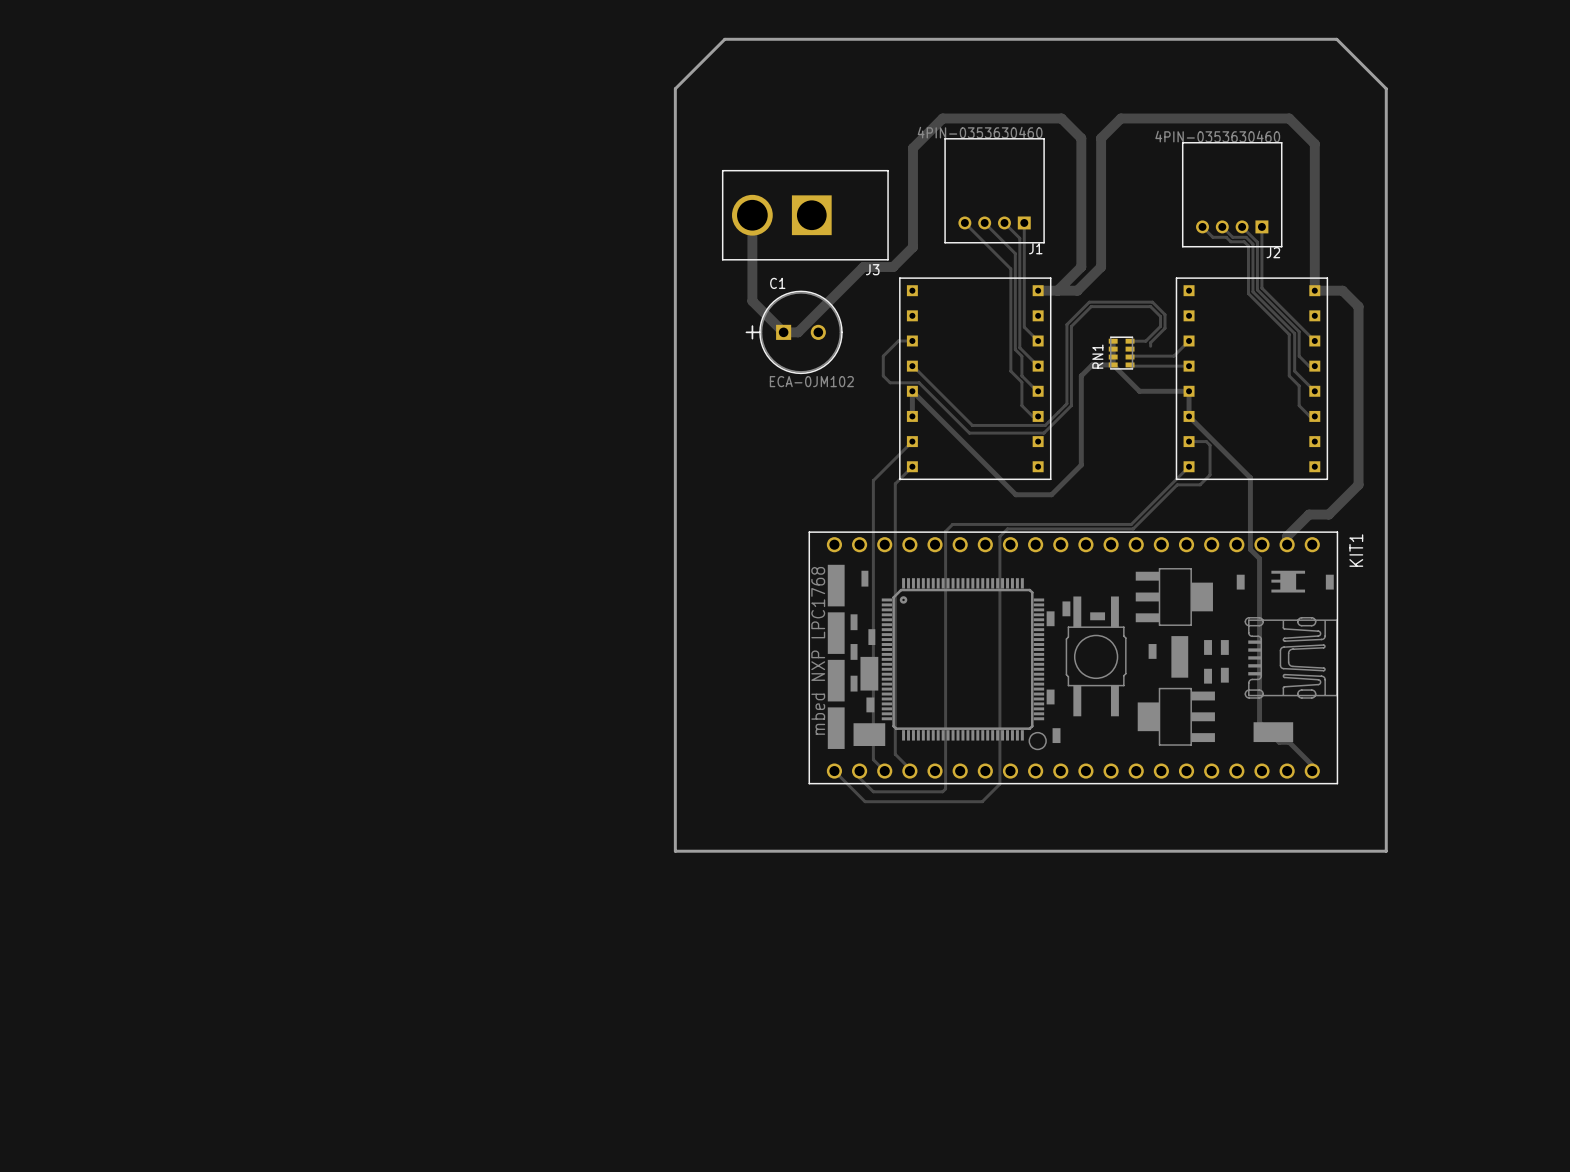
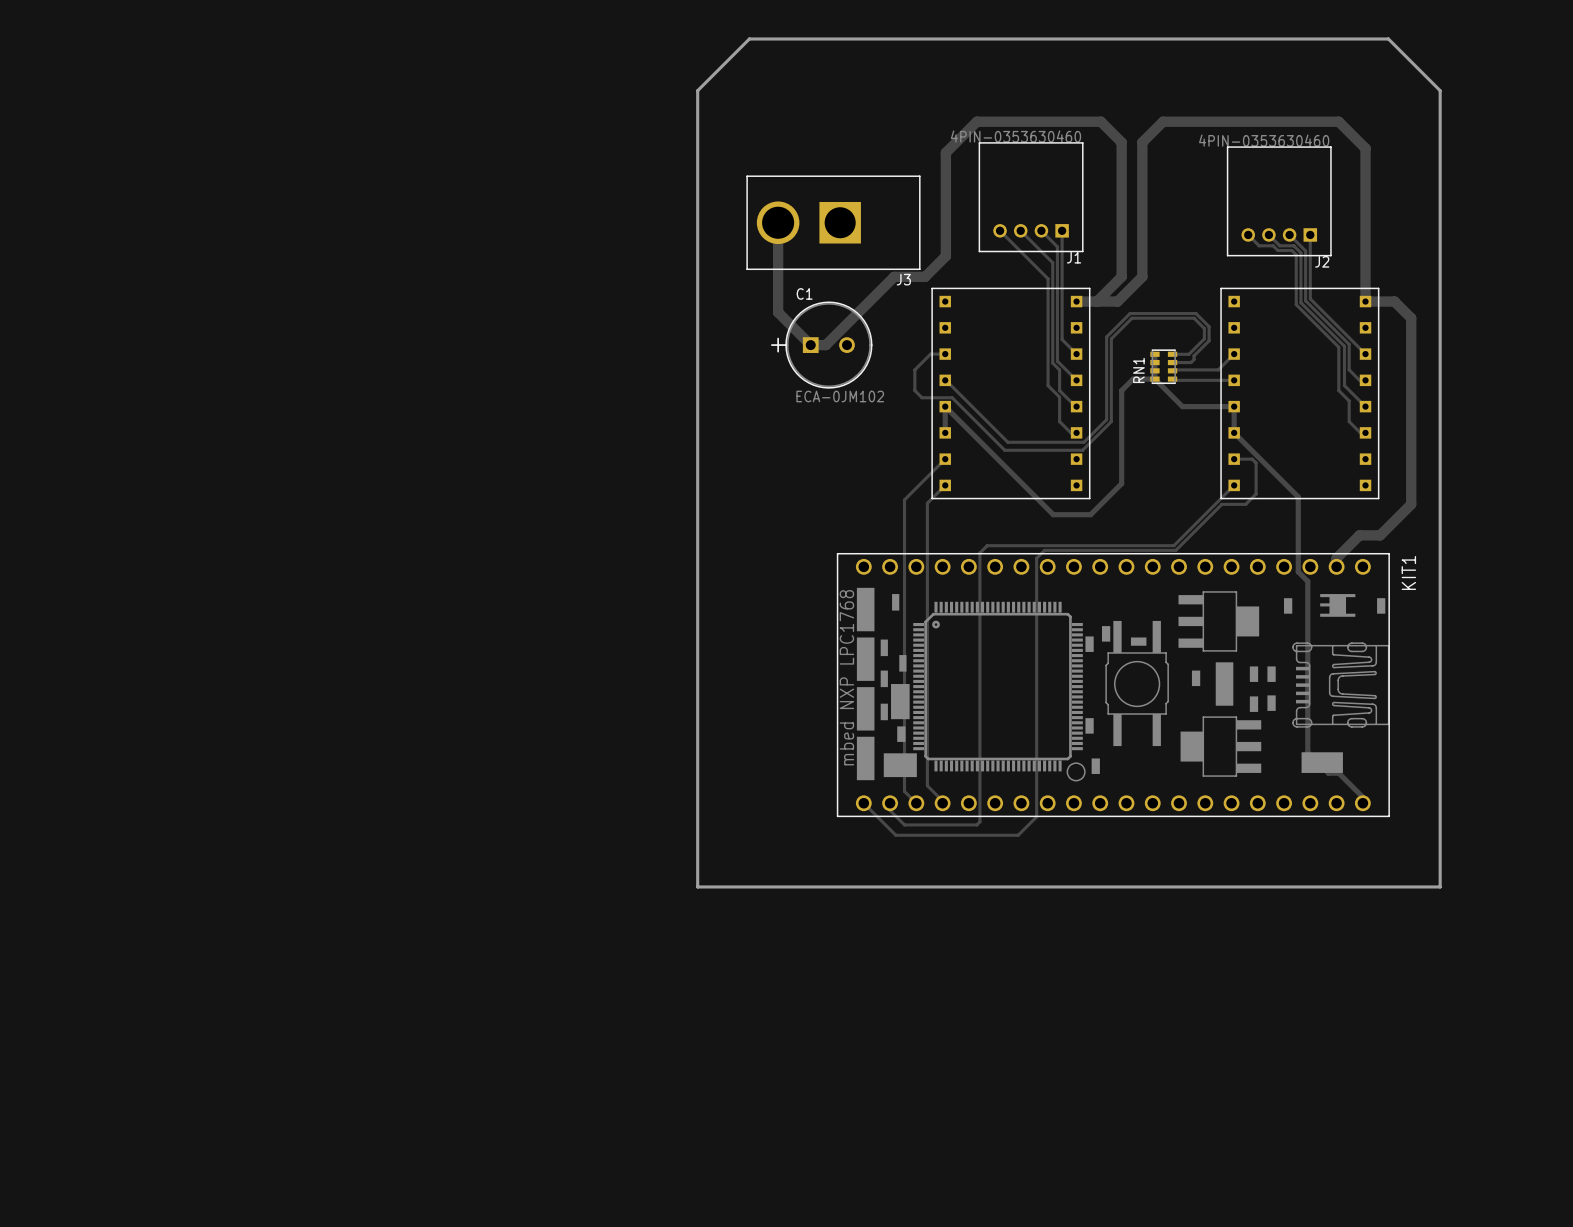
track: none -> (1194, 359) (1191, 362) (1172, 362)

